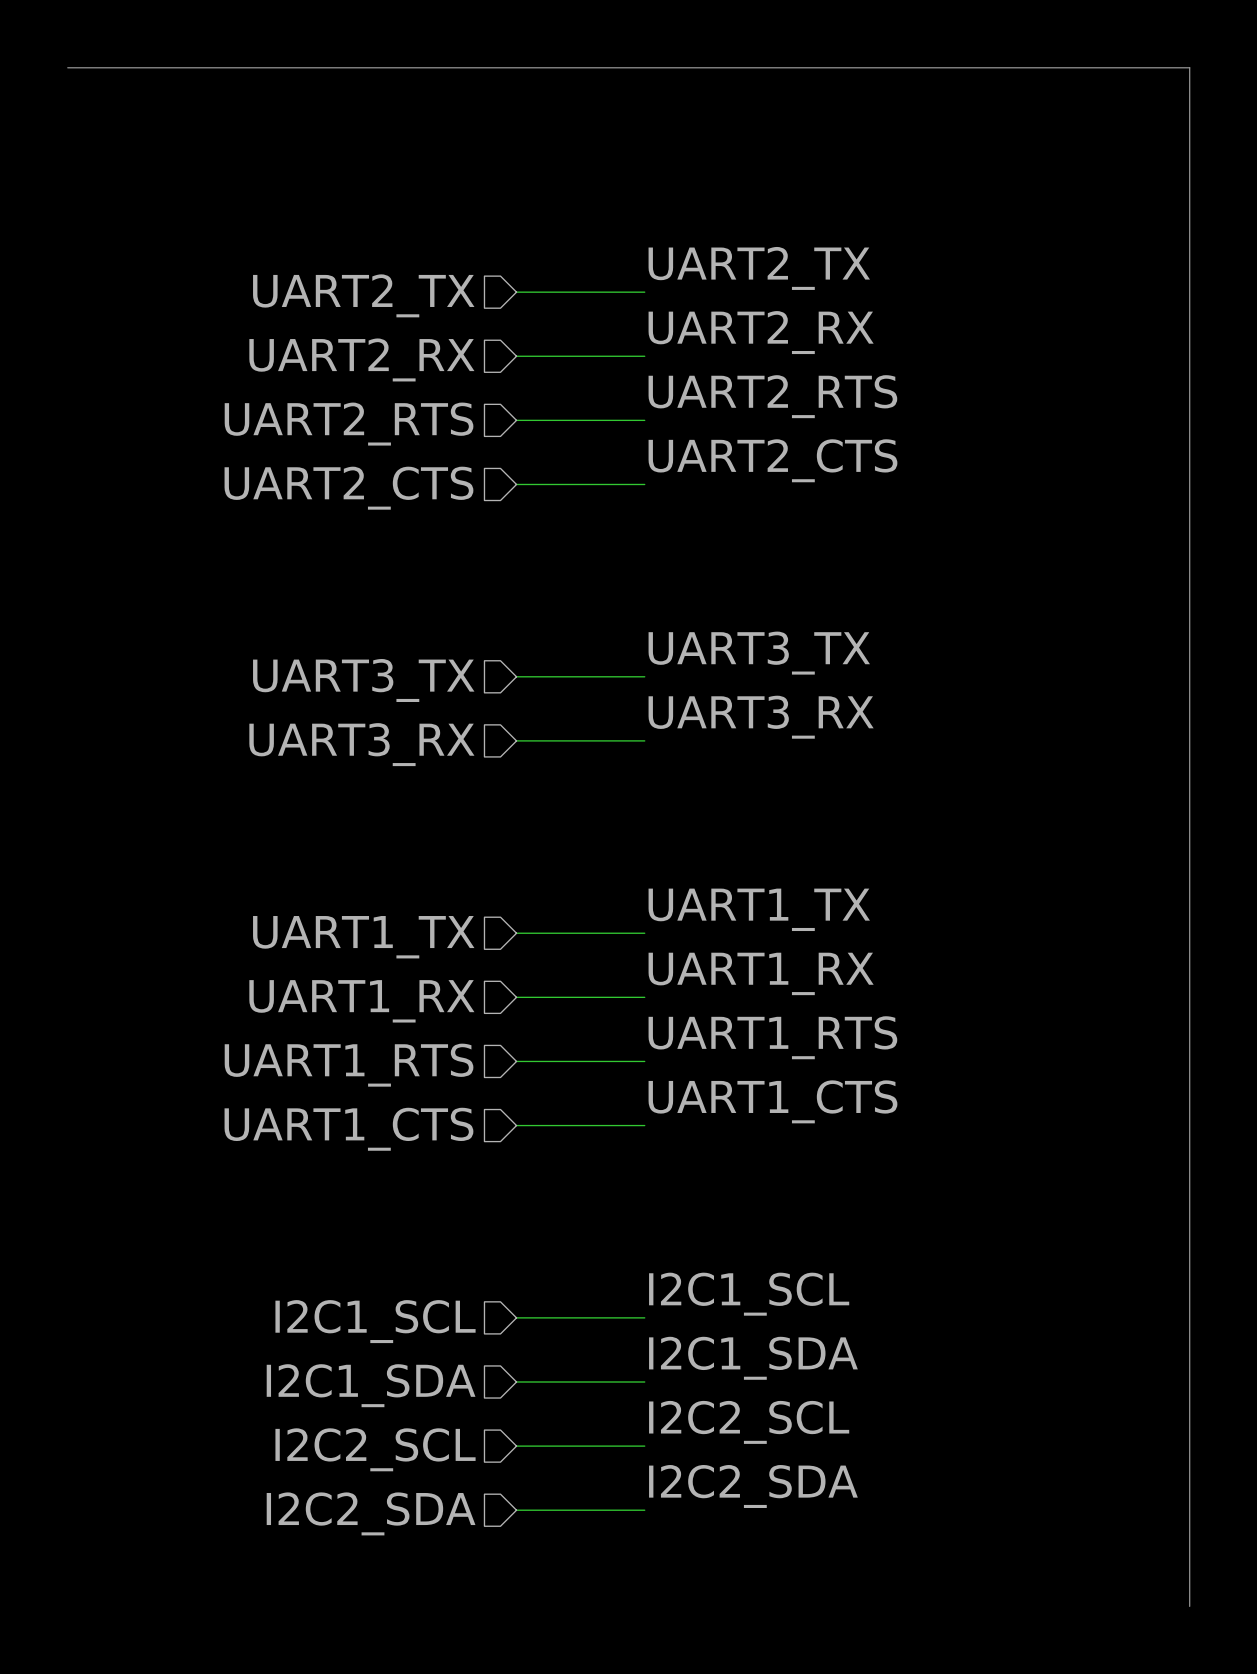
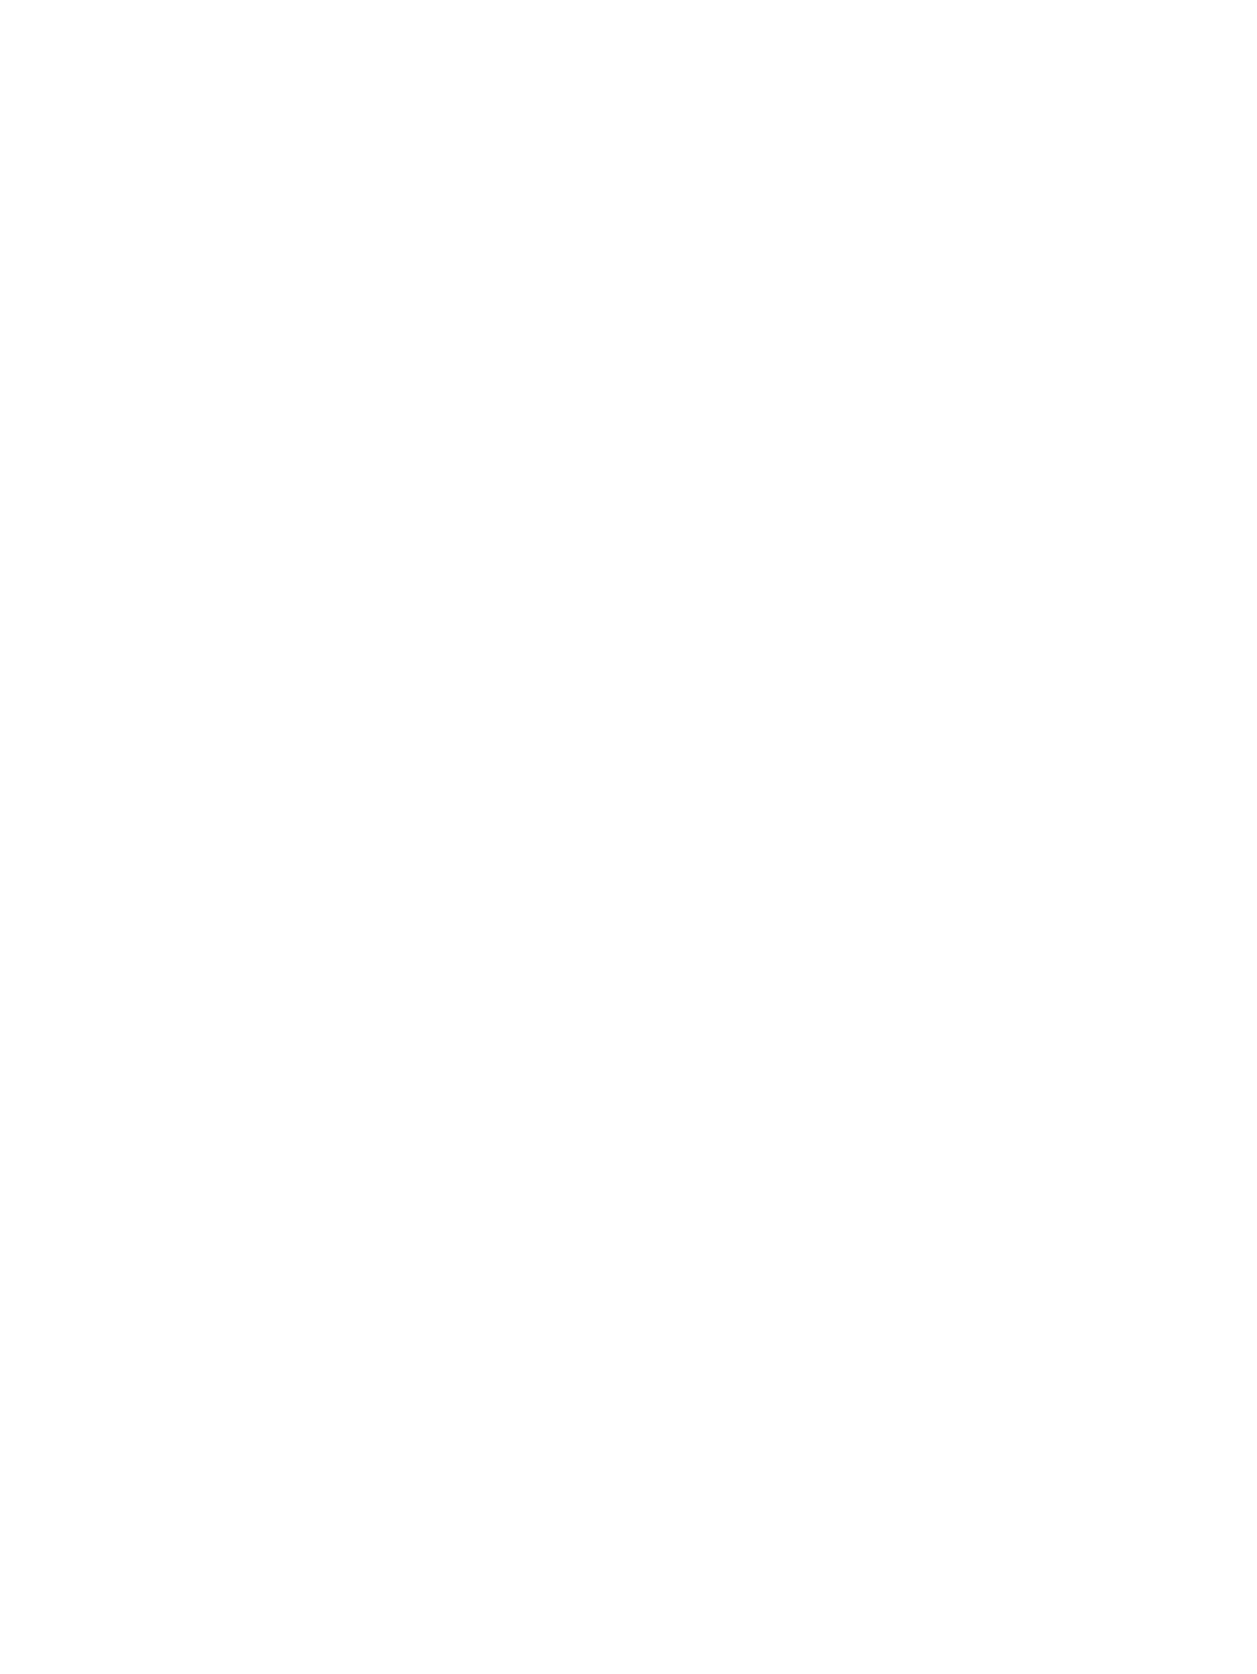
line: (67, 67) (1189, 67) (1189, 1606) -> none
label: UART2_TX (759, 268) -> none
wire: (516, 292) (644, 292) -> none
hierarchical label: UART2_TX (363, 295) -> none
label: UART2_RX (761, 332) -> none
wire: (516, 356) (644, 356) -> none
hierarchical label: UART2_RX (361, 359) -> none
label: UART2_RTS (772, 396) -> none
wire: (516, 420) (644, 420) -> none
hierarchical label: UART2_RTS (349, 424) -> none
label: UART2_CTS (772, 460) -> none
wire: (516, 484) (644, 484) -> none
hierarchical label: UART2_CTS (348, 488) -> none
label: UART3_TX (759, 653) -> none
wire: (516, 676) (644, 676) -> none
hierarchical label: UART3_TX (363, 680) -> none
label: UART3_RX (761, 717) -> none
wire: (516, 740) (644, 740) -> none
hierarchical label: UART3_RX (361, 744) -> none
label: UART1_TX (759, 909) -> none
wire: (516, 933) (644, 933) -> none
hierarchical label: UART1_TX (363, 937) -> none
label: UART1_RX (761, 973) -> none
wire: (516, 997) (644, 997) -> none
hierarchical label: UART1_RX (361, 1001) -> none
label: UART1_RTS (772, 1037) -> none
wire: (516, 1061) (644, 1061) -> none
hierarchical label: UART1_RTS (349, 1065) -> none
label: UART1_CTS (772, 1101) -> none
wire: (516, 1125) (644, 1125) -> none
hierarchical label: UART1_CTS (348, 1129) -> none
label: I2C1_SCL (749, 1294) -> none
wire: (516, 1317) (644, 1317) -> none
hierarchical label: I2C1_SCL (375, 1321) -> none
label: I2C1_SDA (753, 1358) -> none
wire: (516, 1381) (644, 1381) -> none
hierarchical label: I2C1_SDA (371, 1385) -> none
label: I2C2_SCL (749, 1422) -> none
wire: (516, 1446) (644, 1446) -> none
hierarchical label: I2C2_SCL (375, 1449) -> none
label: I2C2_SDA (753, 1486) -> none
wire: (516, 1510) (644, 1510) -> none
hierarchical label: I2C2_SDA (371, 1513) -> none

